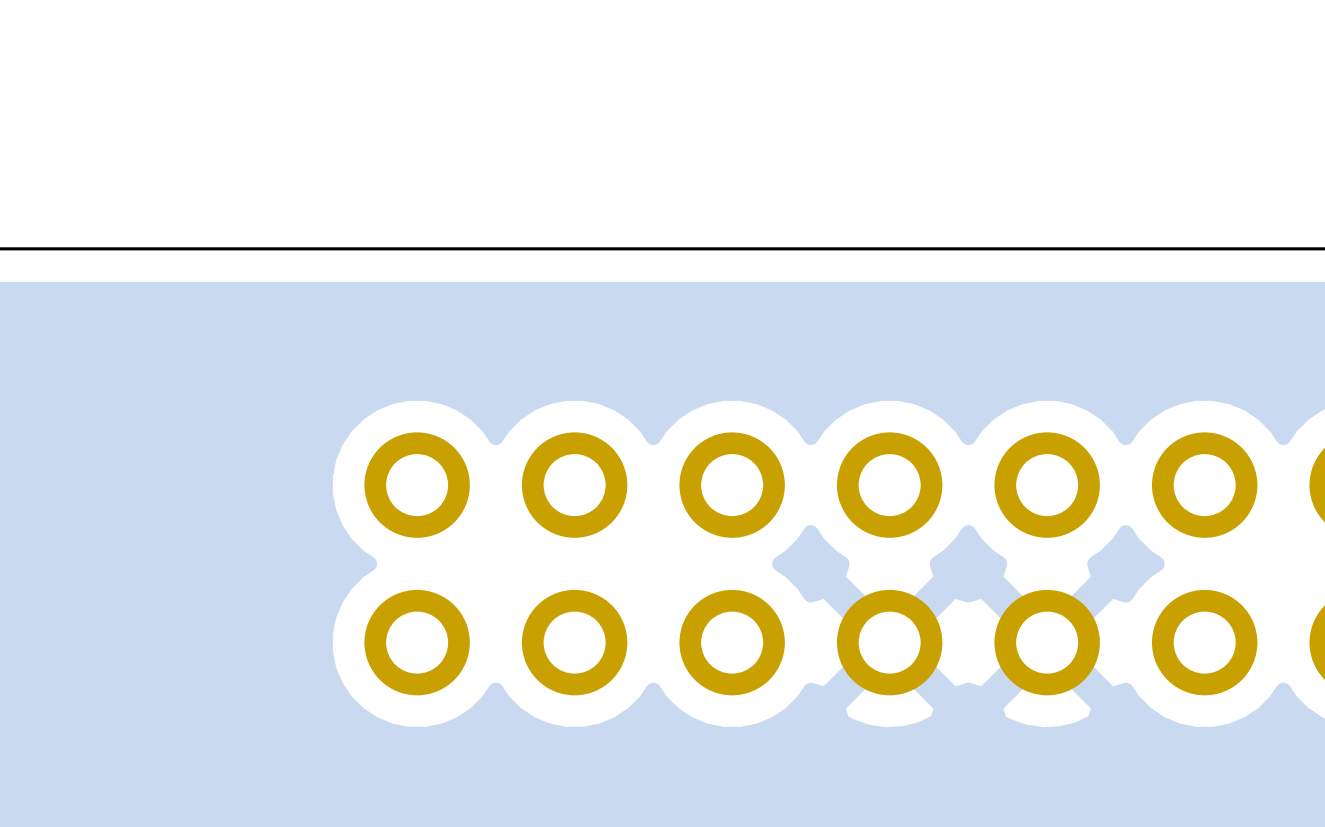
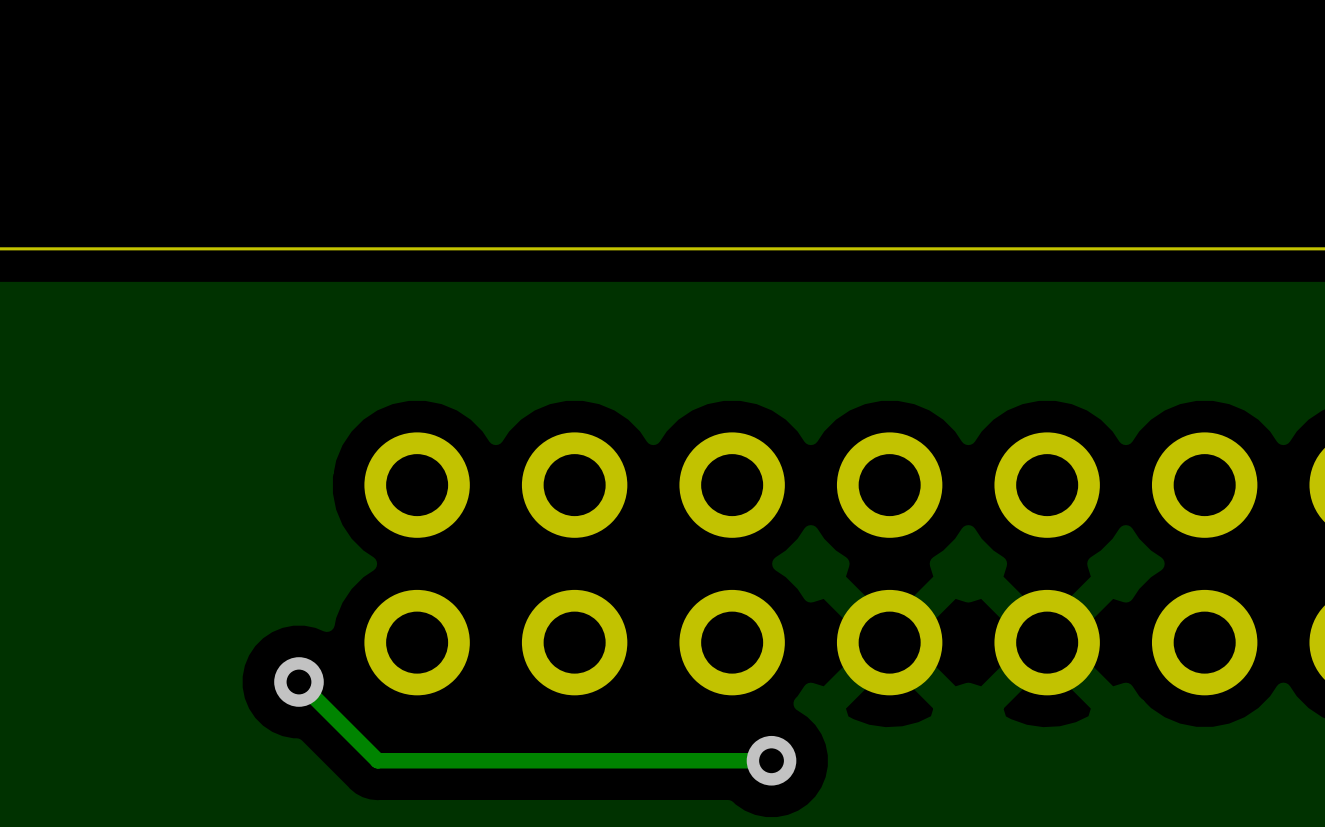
track: none -> (298, 681) (377, 760) (771, 760)
via: none -> (298, 681)
via: none -> (771, 760)

